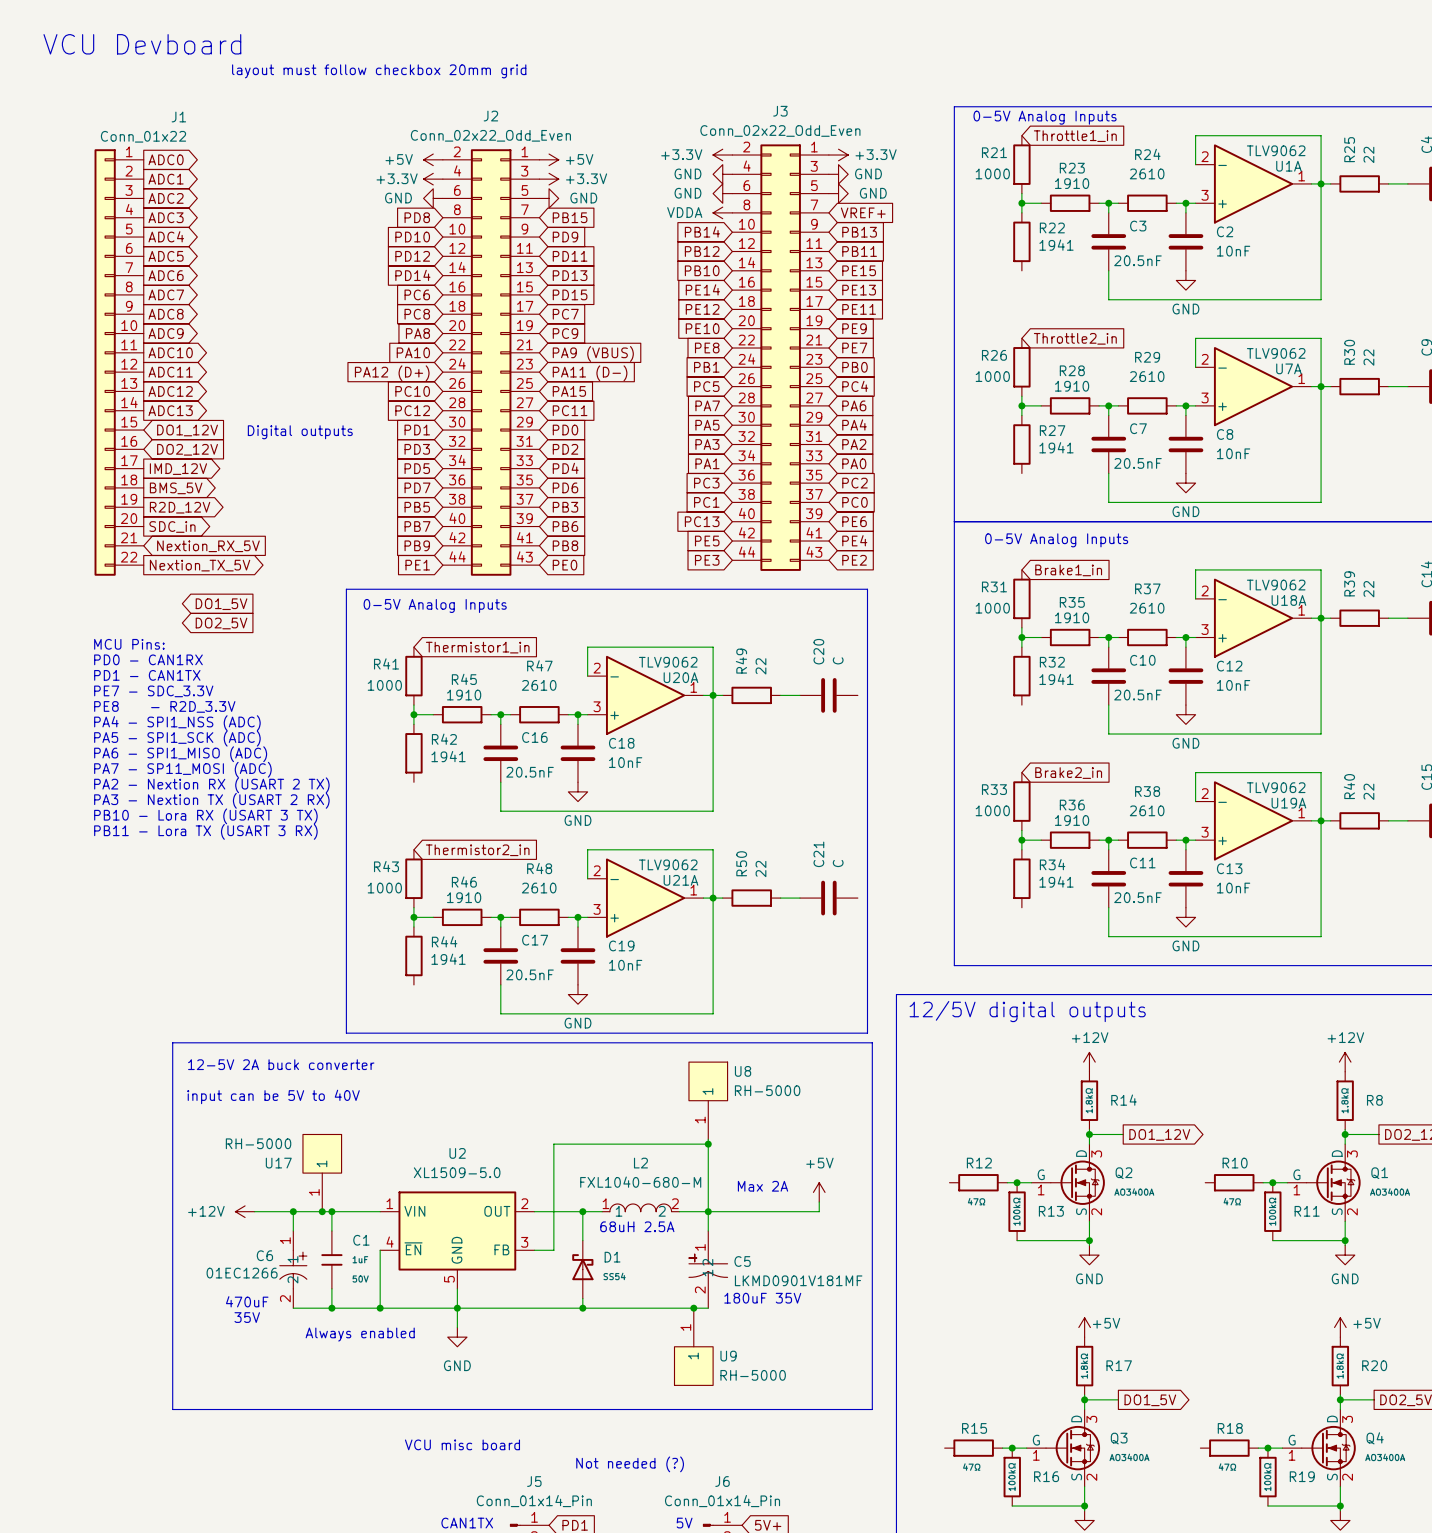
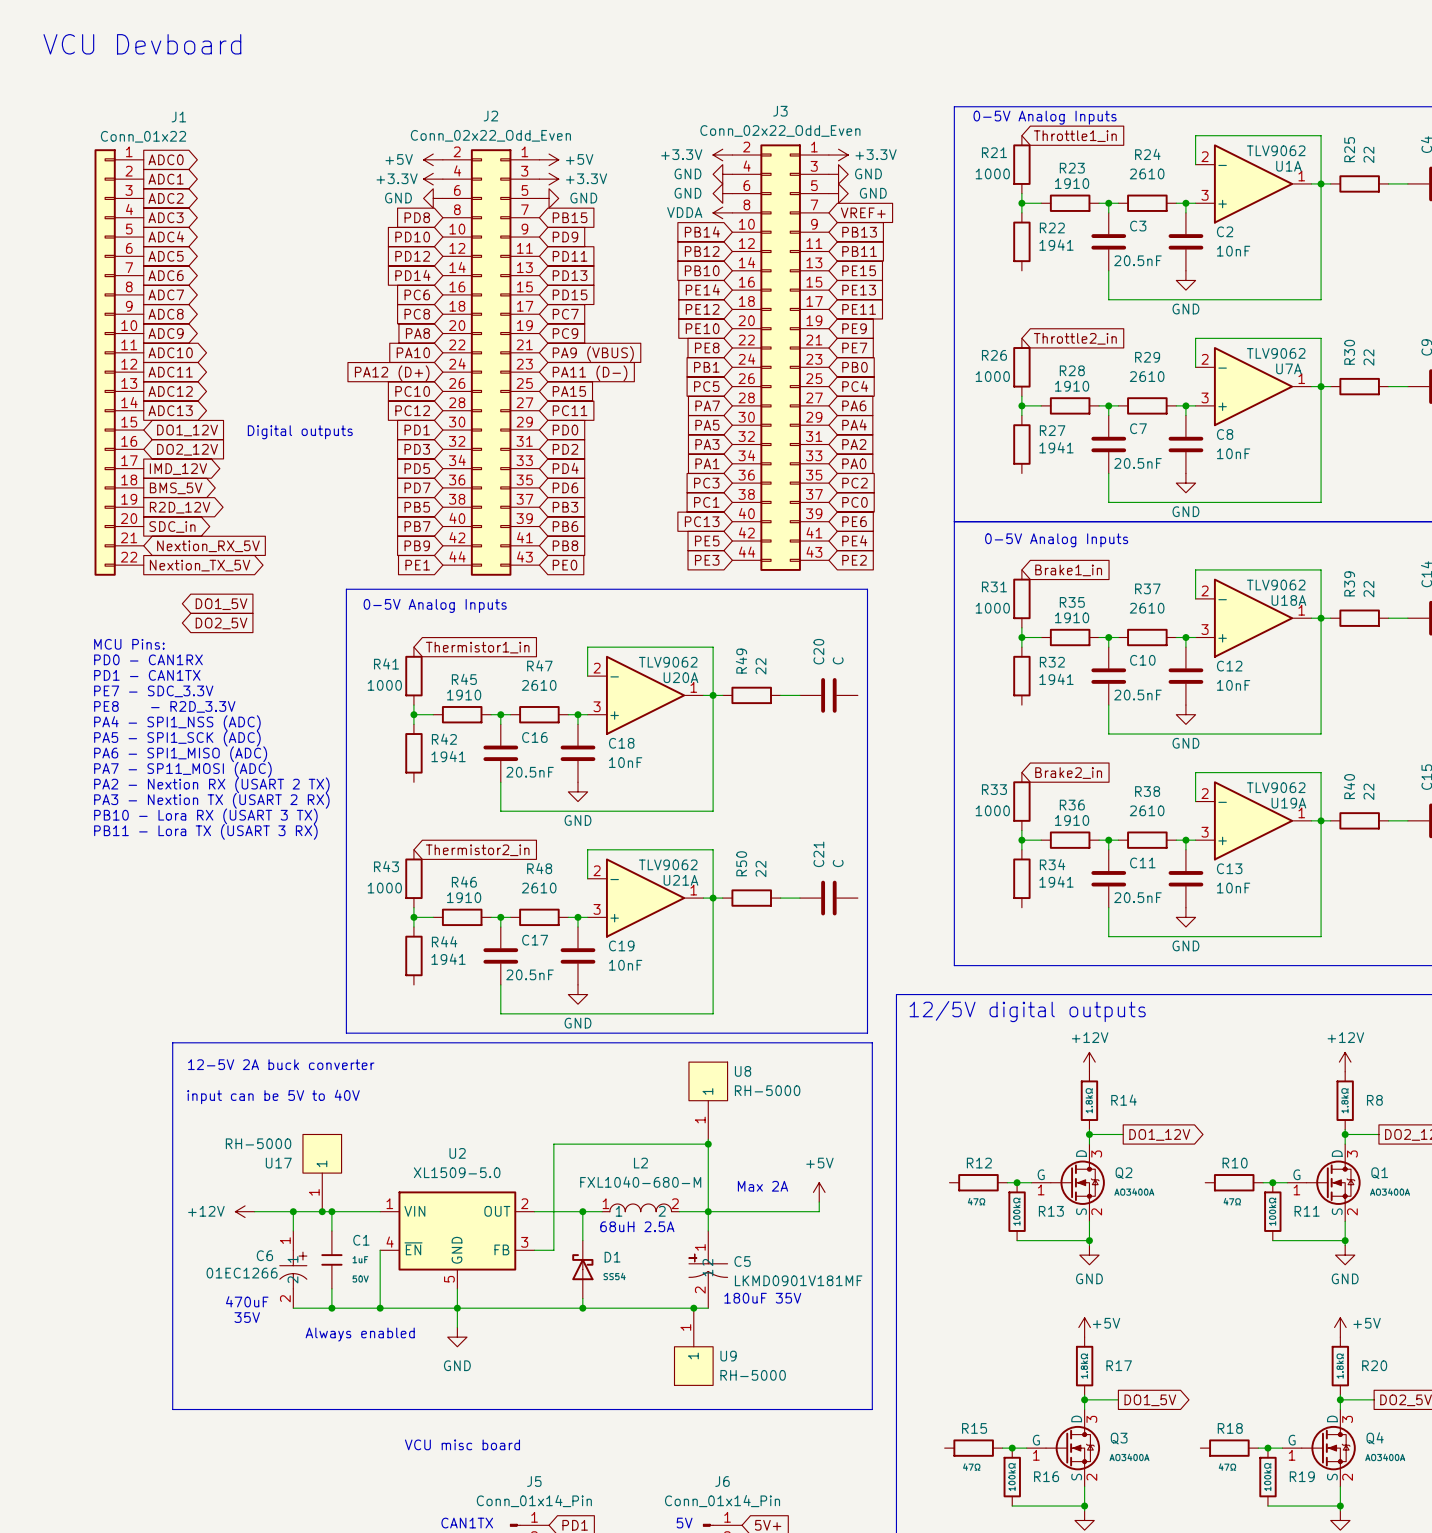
text: layout must follow checkbox 20mm grid (379, 71) -> none
text: Not needed (?) (630, 1464) -> none

